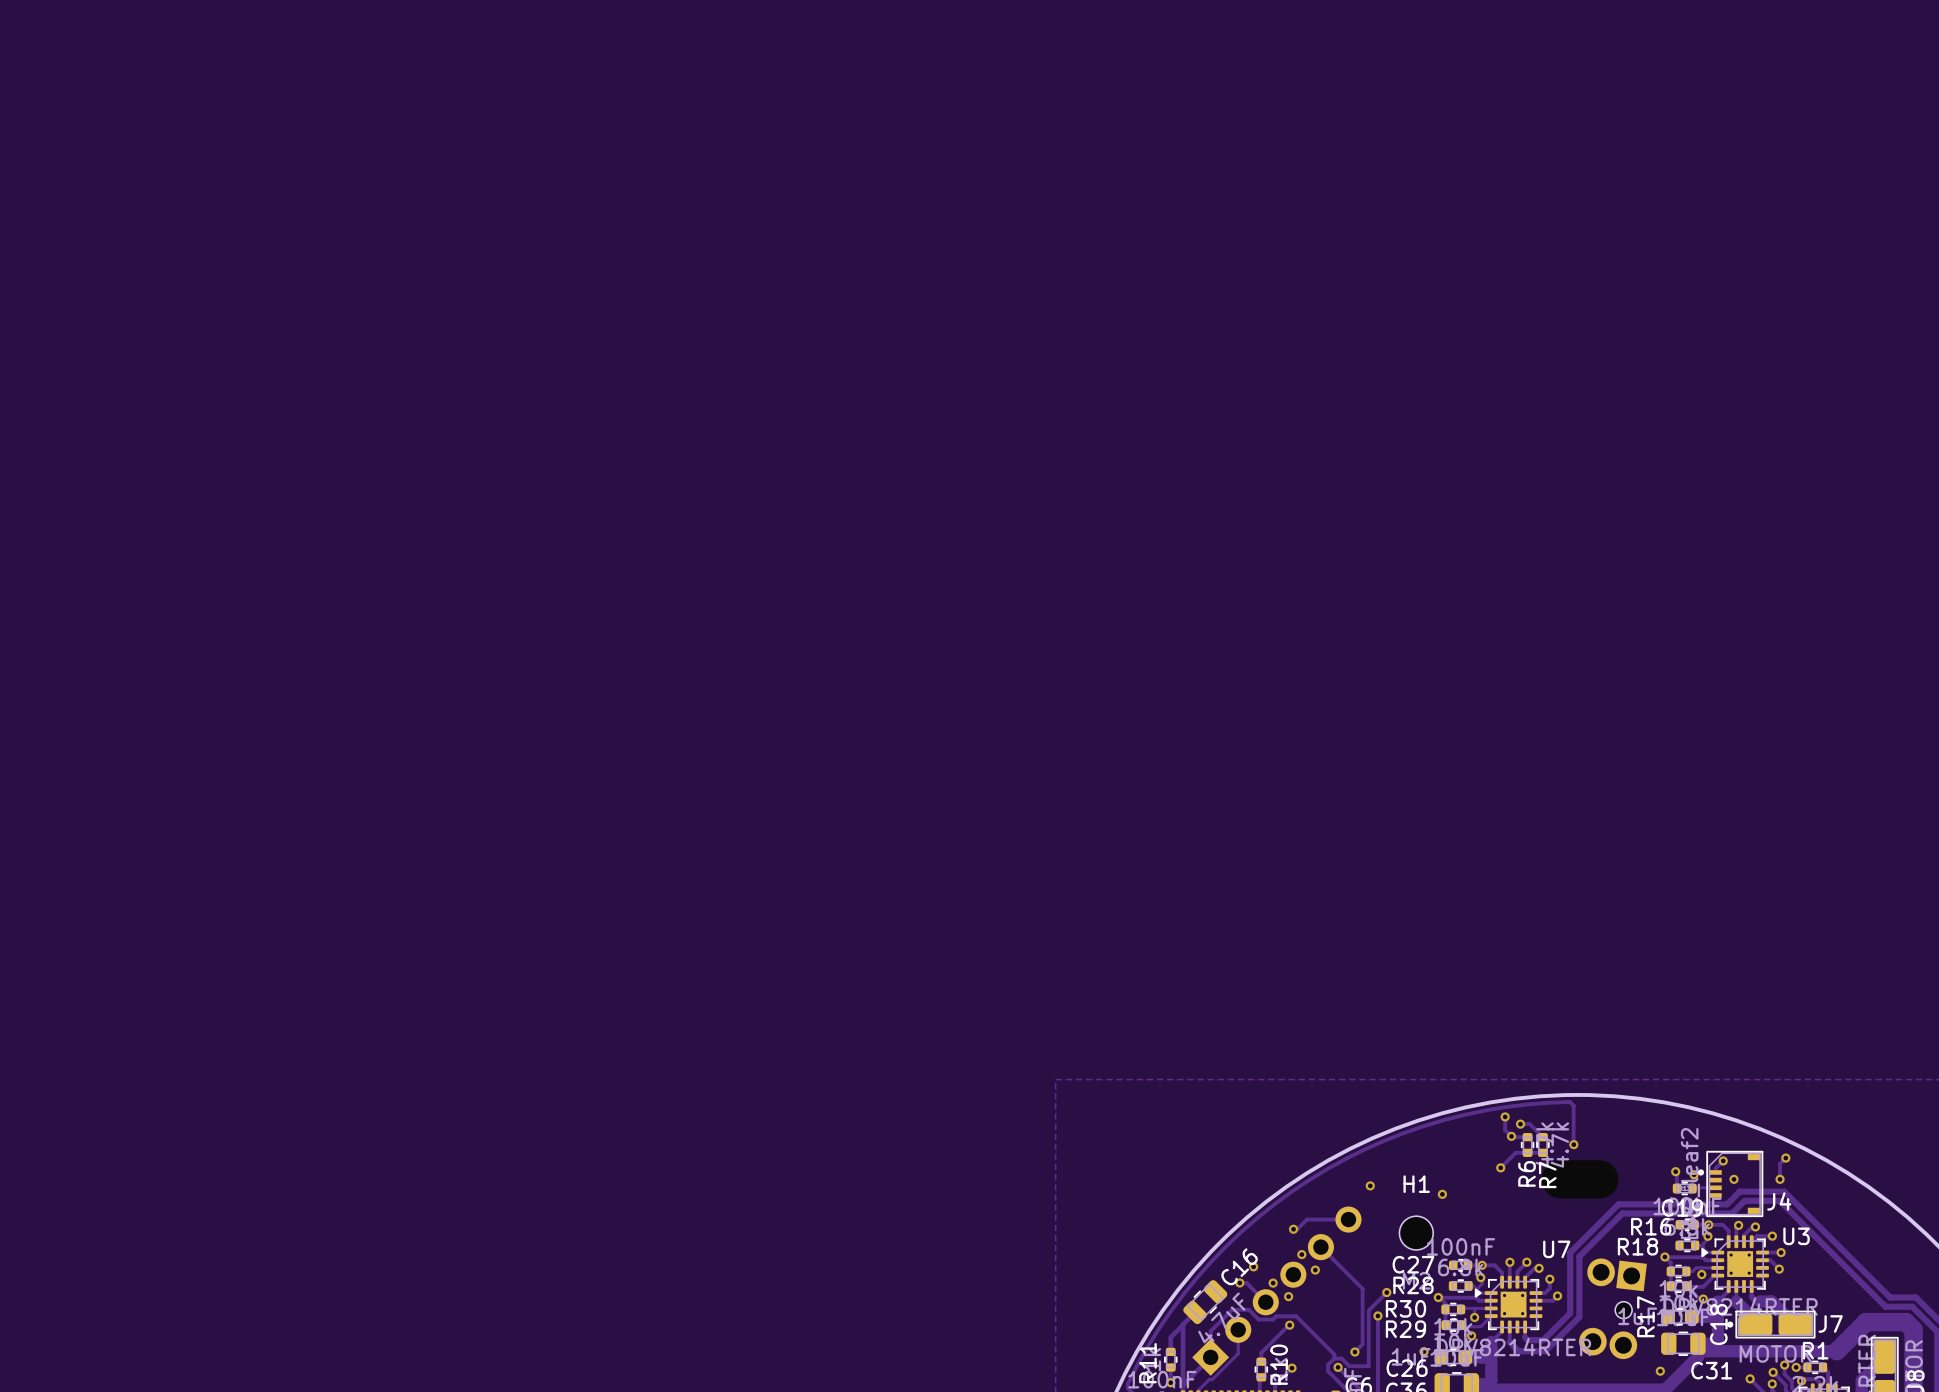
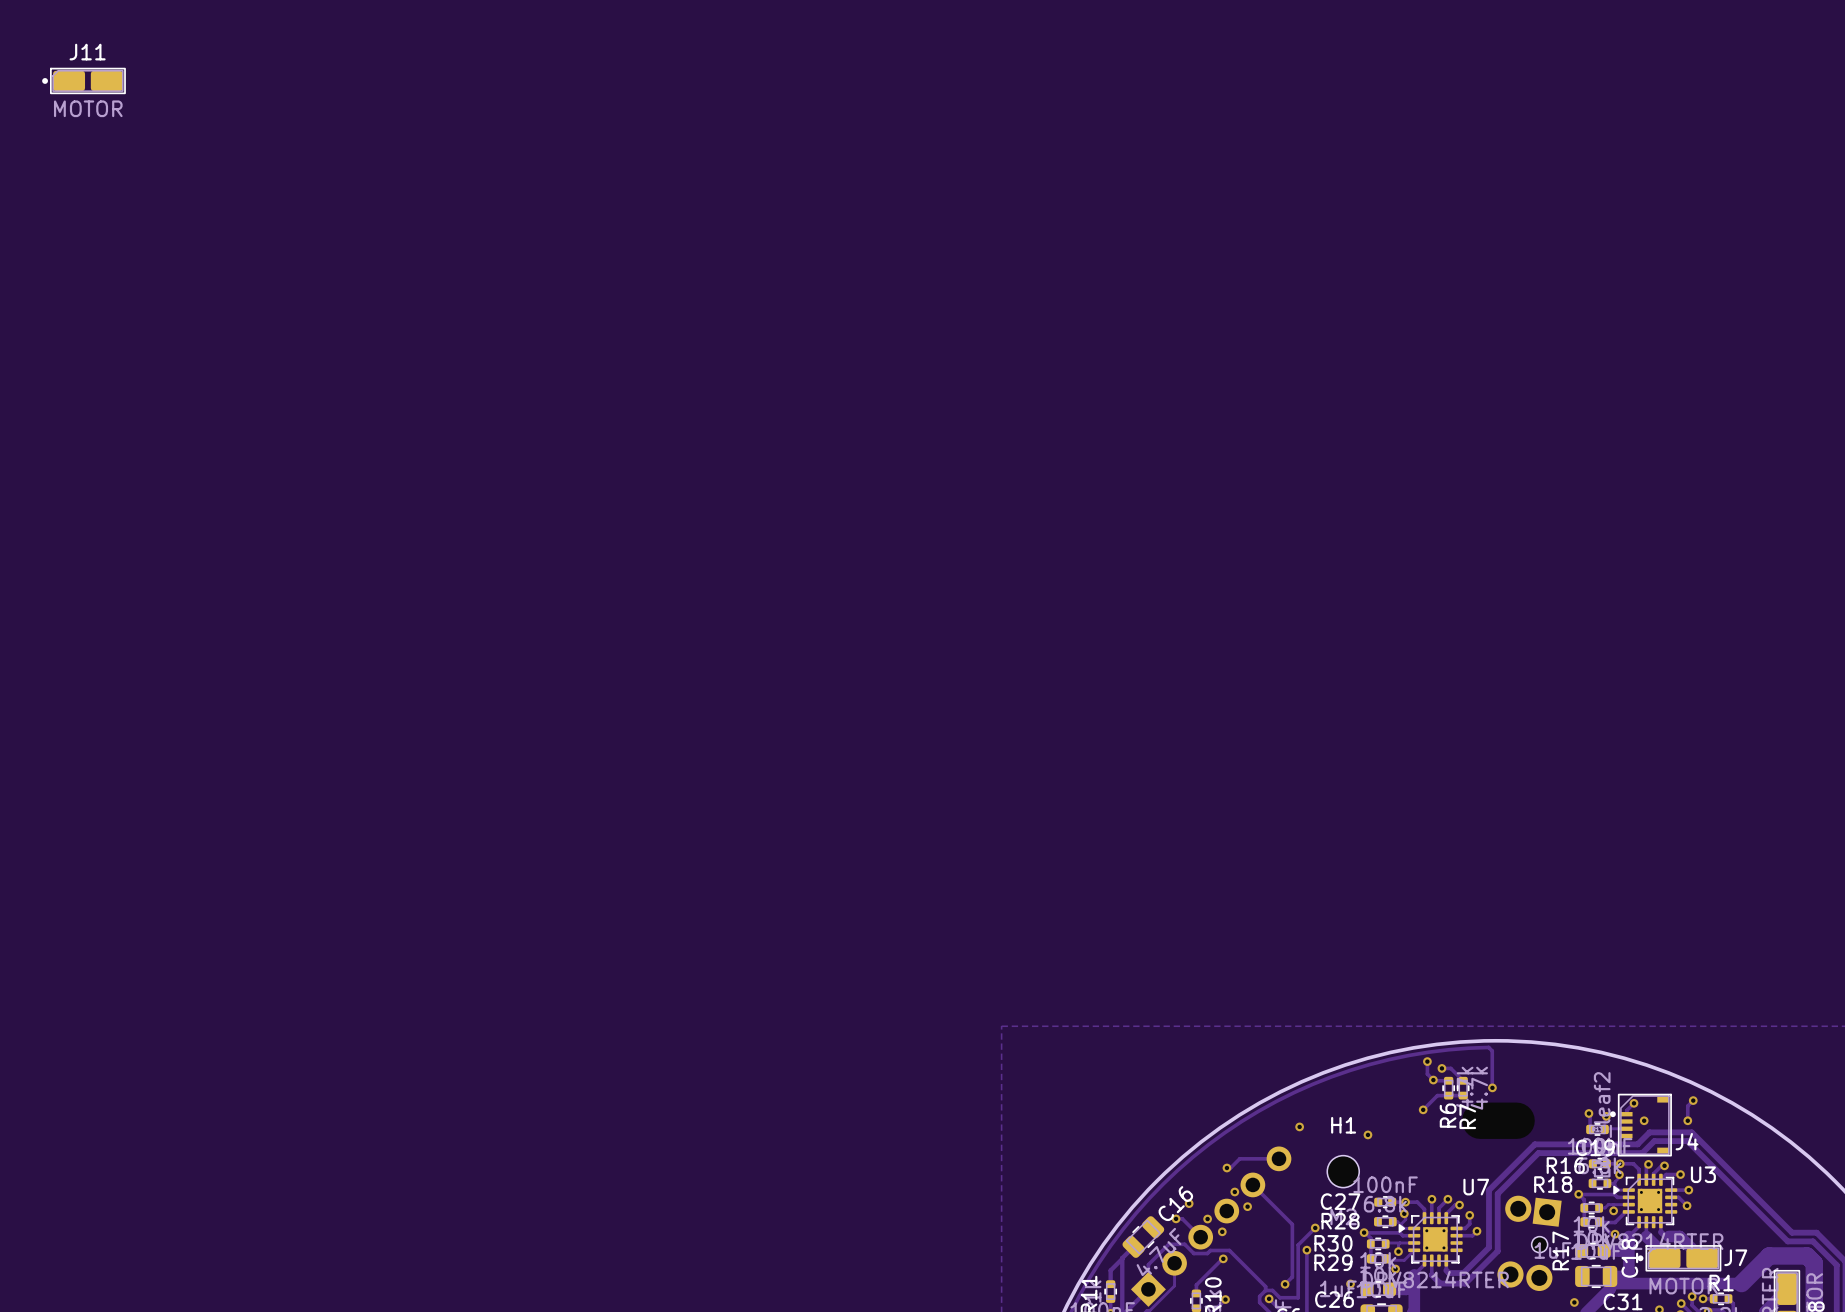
J11: none -> MOTOR (84, 80)

